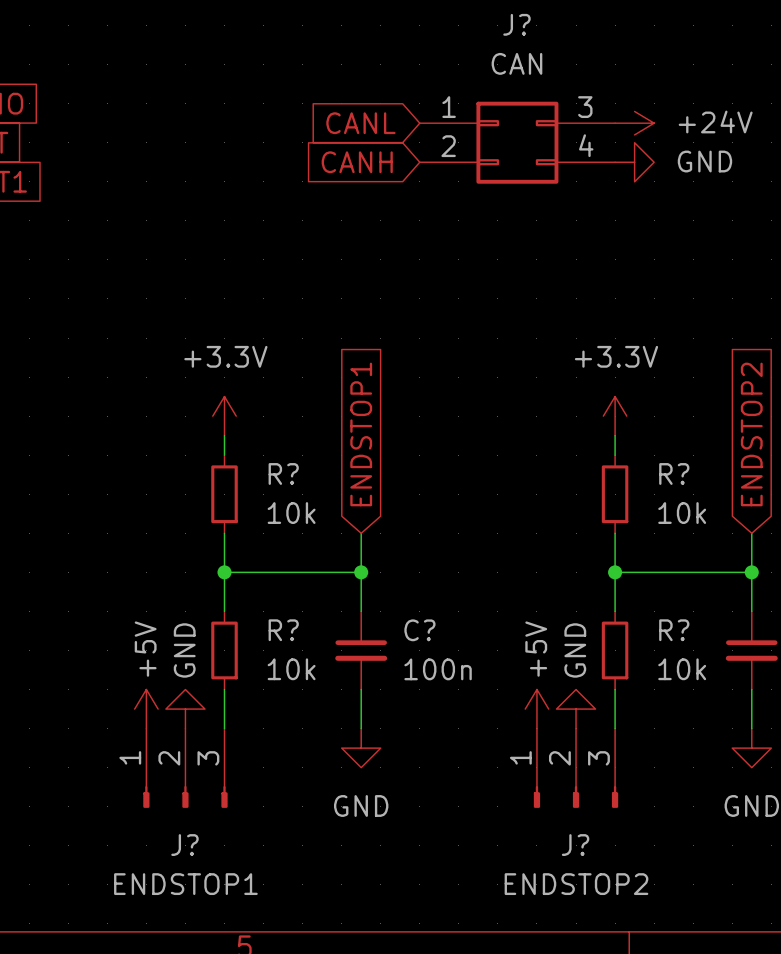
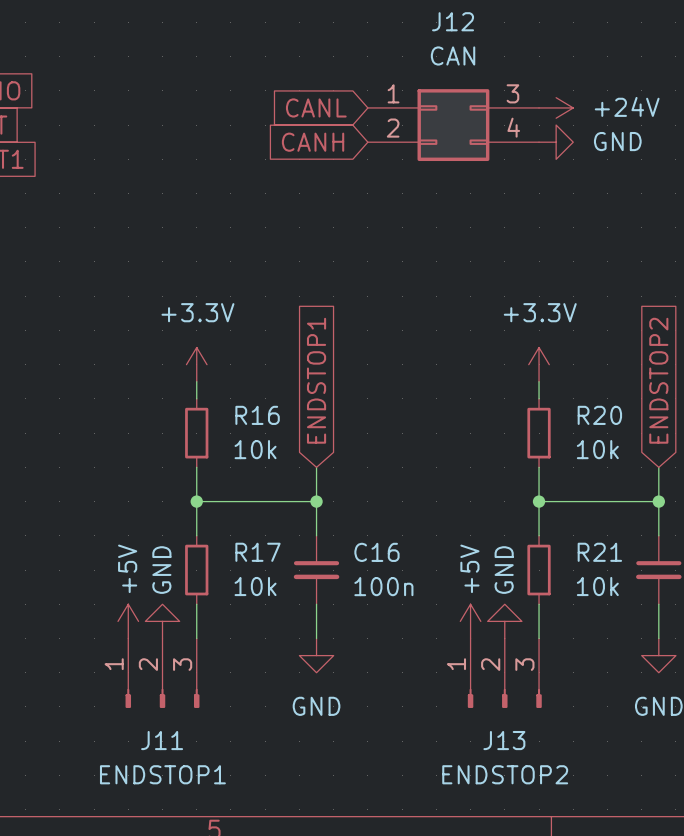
J? name: J? (516, 24) -> J12 (453, 21)
R? name: R? (283, 473) -> R16 (257, 415)
R? name: R? (674, 473) -> R20 (599, 415)
R? name: R? (283, 630) -> R17 (257, 552)
C? name: C? (419, 630) -> C16 (376, 552)
R? name: R? (674, 630) -> R21 (599, 552)
J? name: J? (184, 845) -> J11 (162, 740)
J? name: J? (575, 845) -> J13 (504, 740)

